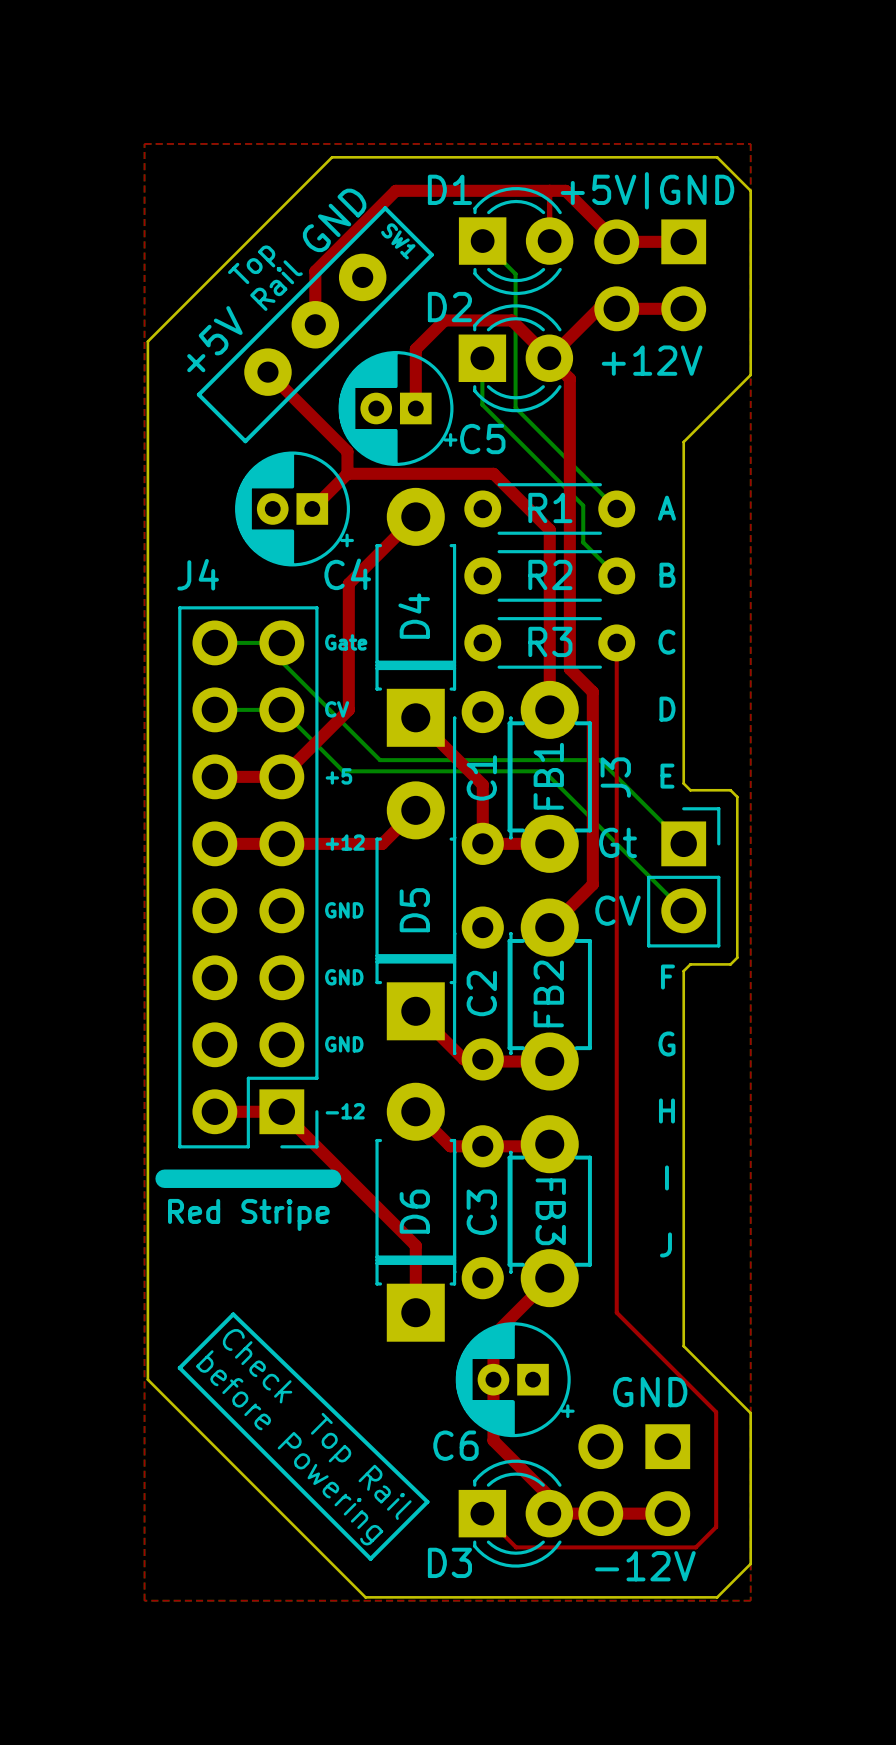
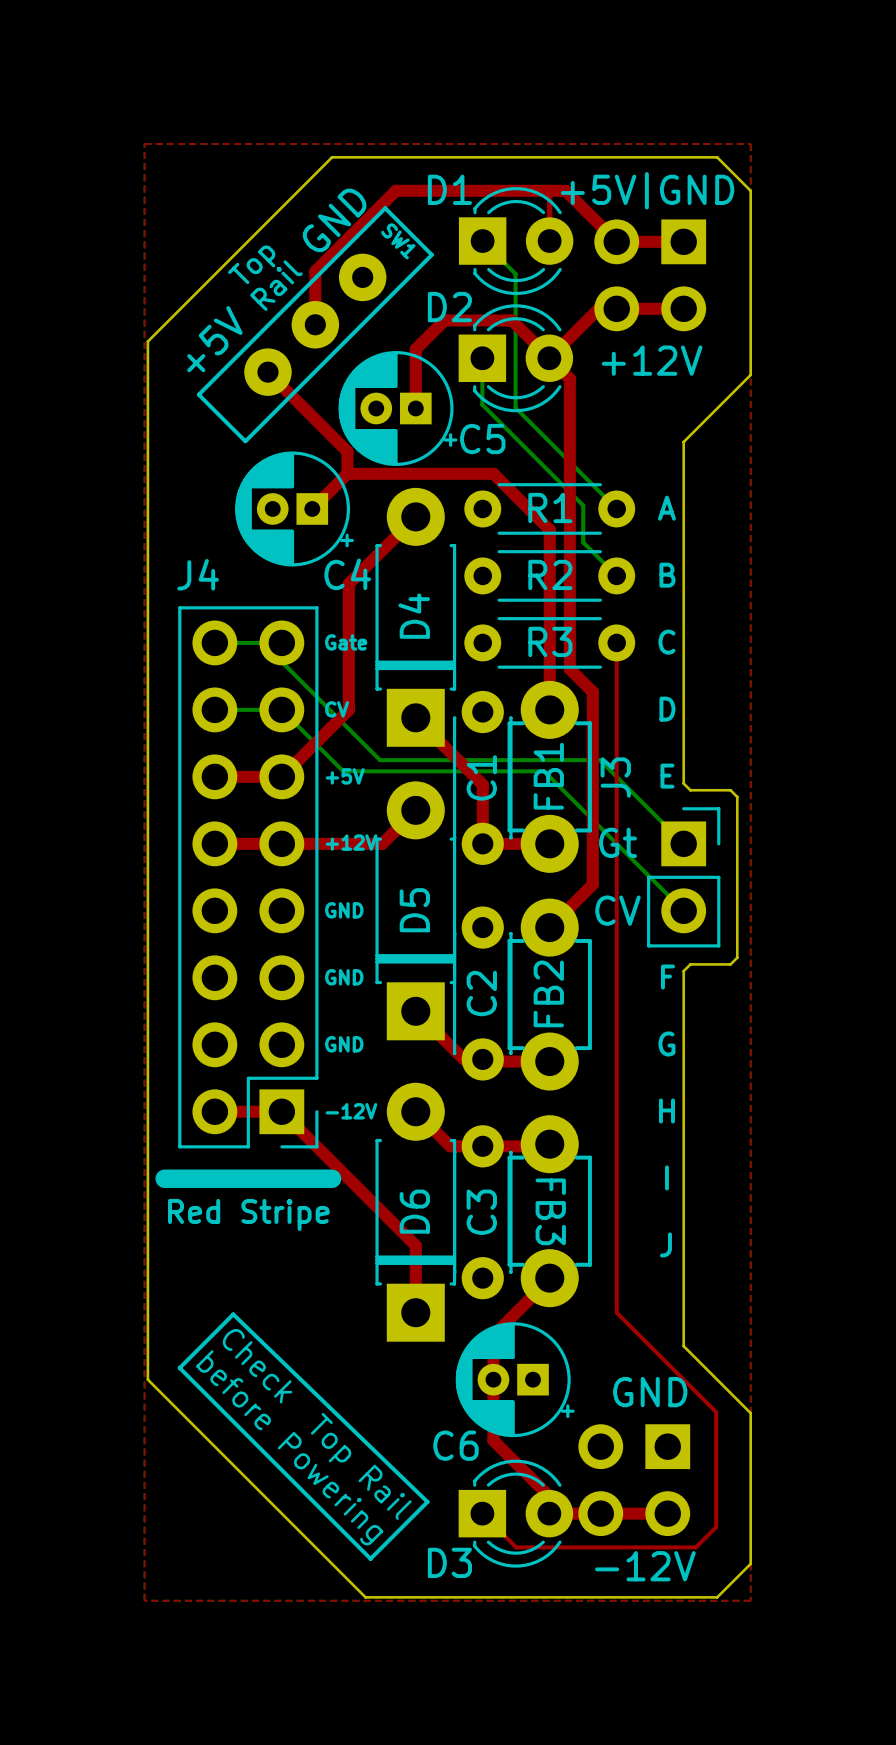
text: +5 (338, 776) -> +5V (345, 776)
text: +12 (345, 842) -> +12V (351, 842)
text: -12 (345, 1111) -> -12V (351, 1111)

